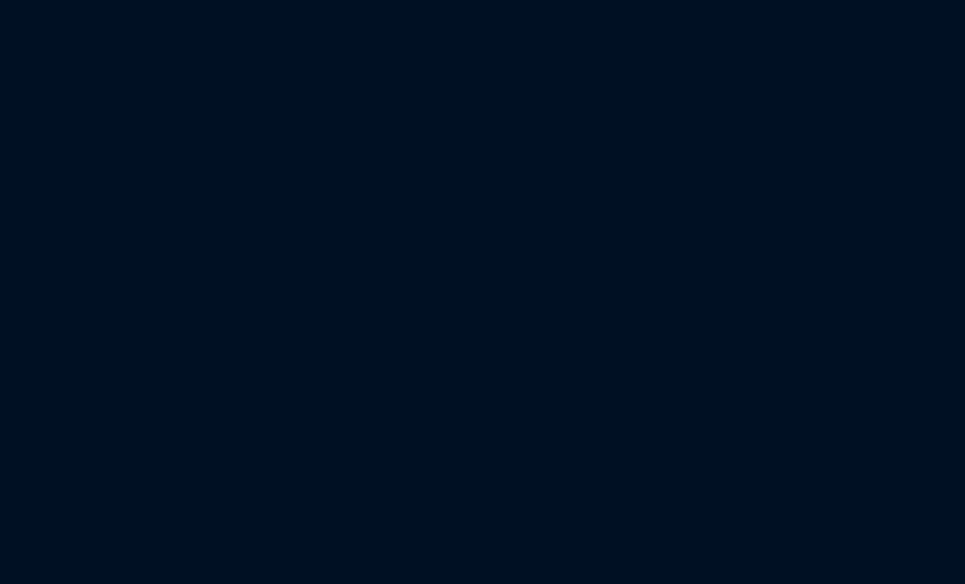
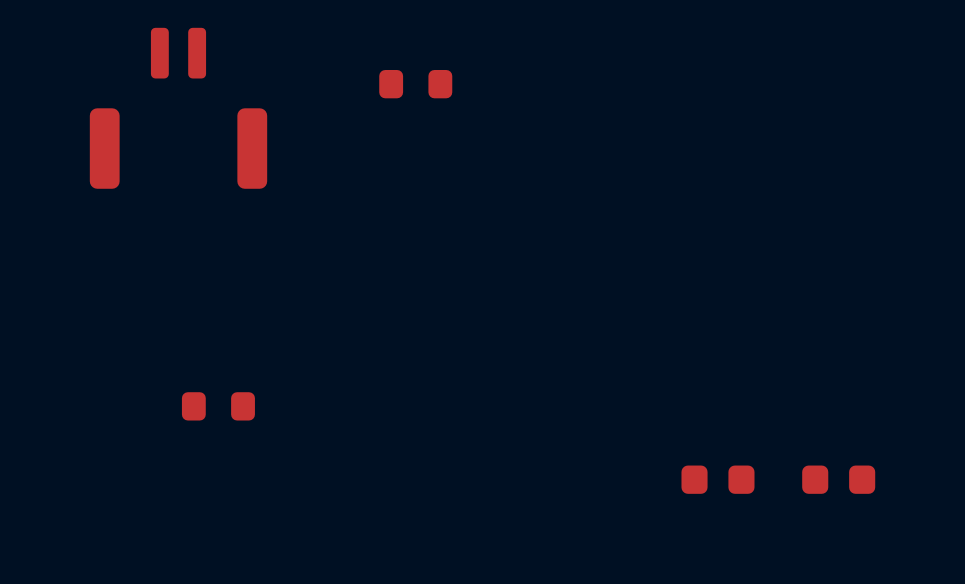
part: none -> (415, 84)
part: none -> (178, 108)
part: none -> (218, 406)
part: none -> (717, 479)
part: none -> (838, 479)

